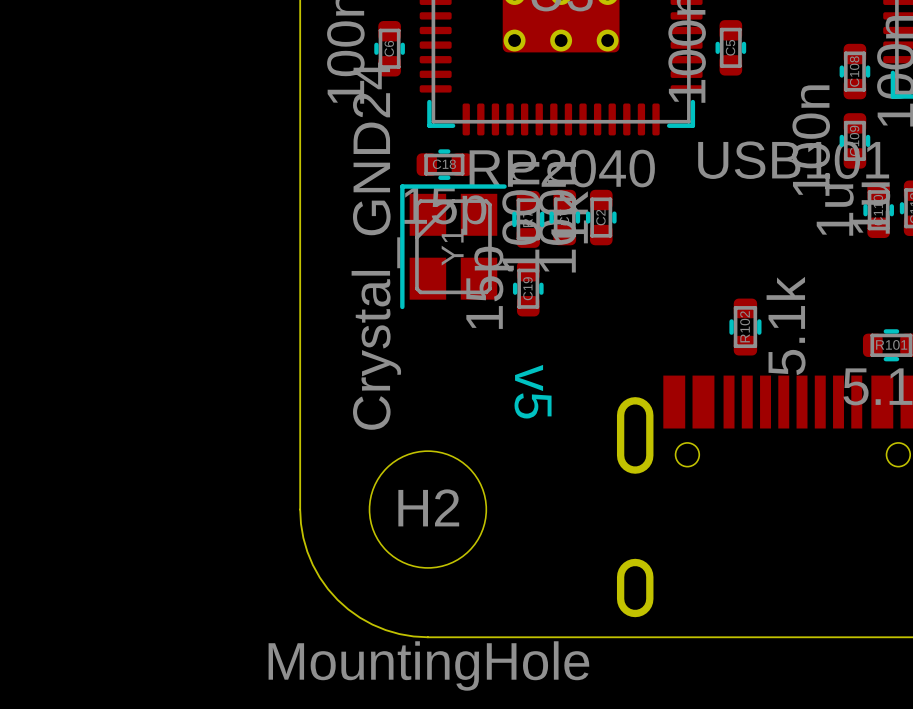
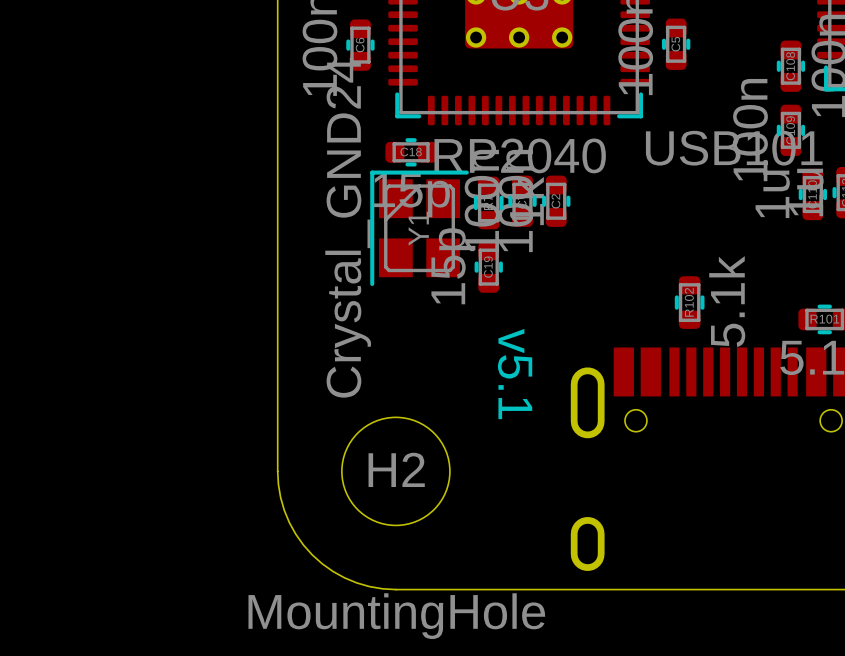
text: v5 (533, 391) -> v5.1 (515, 374)

